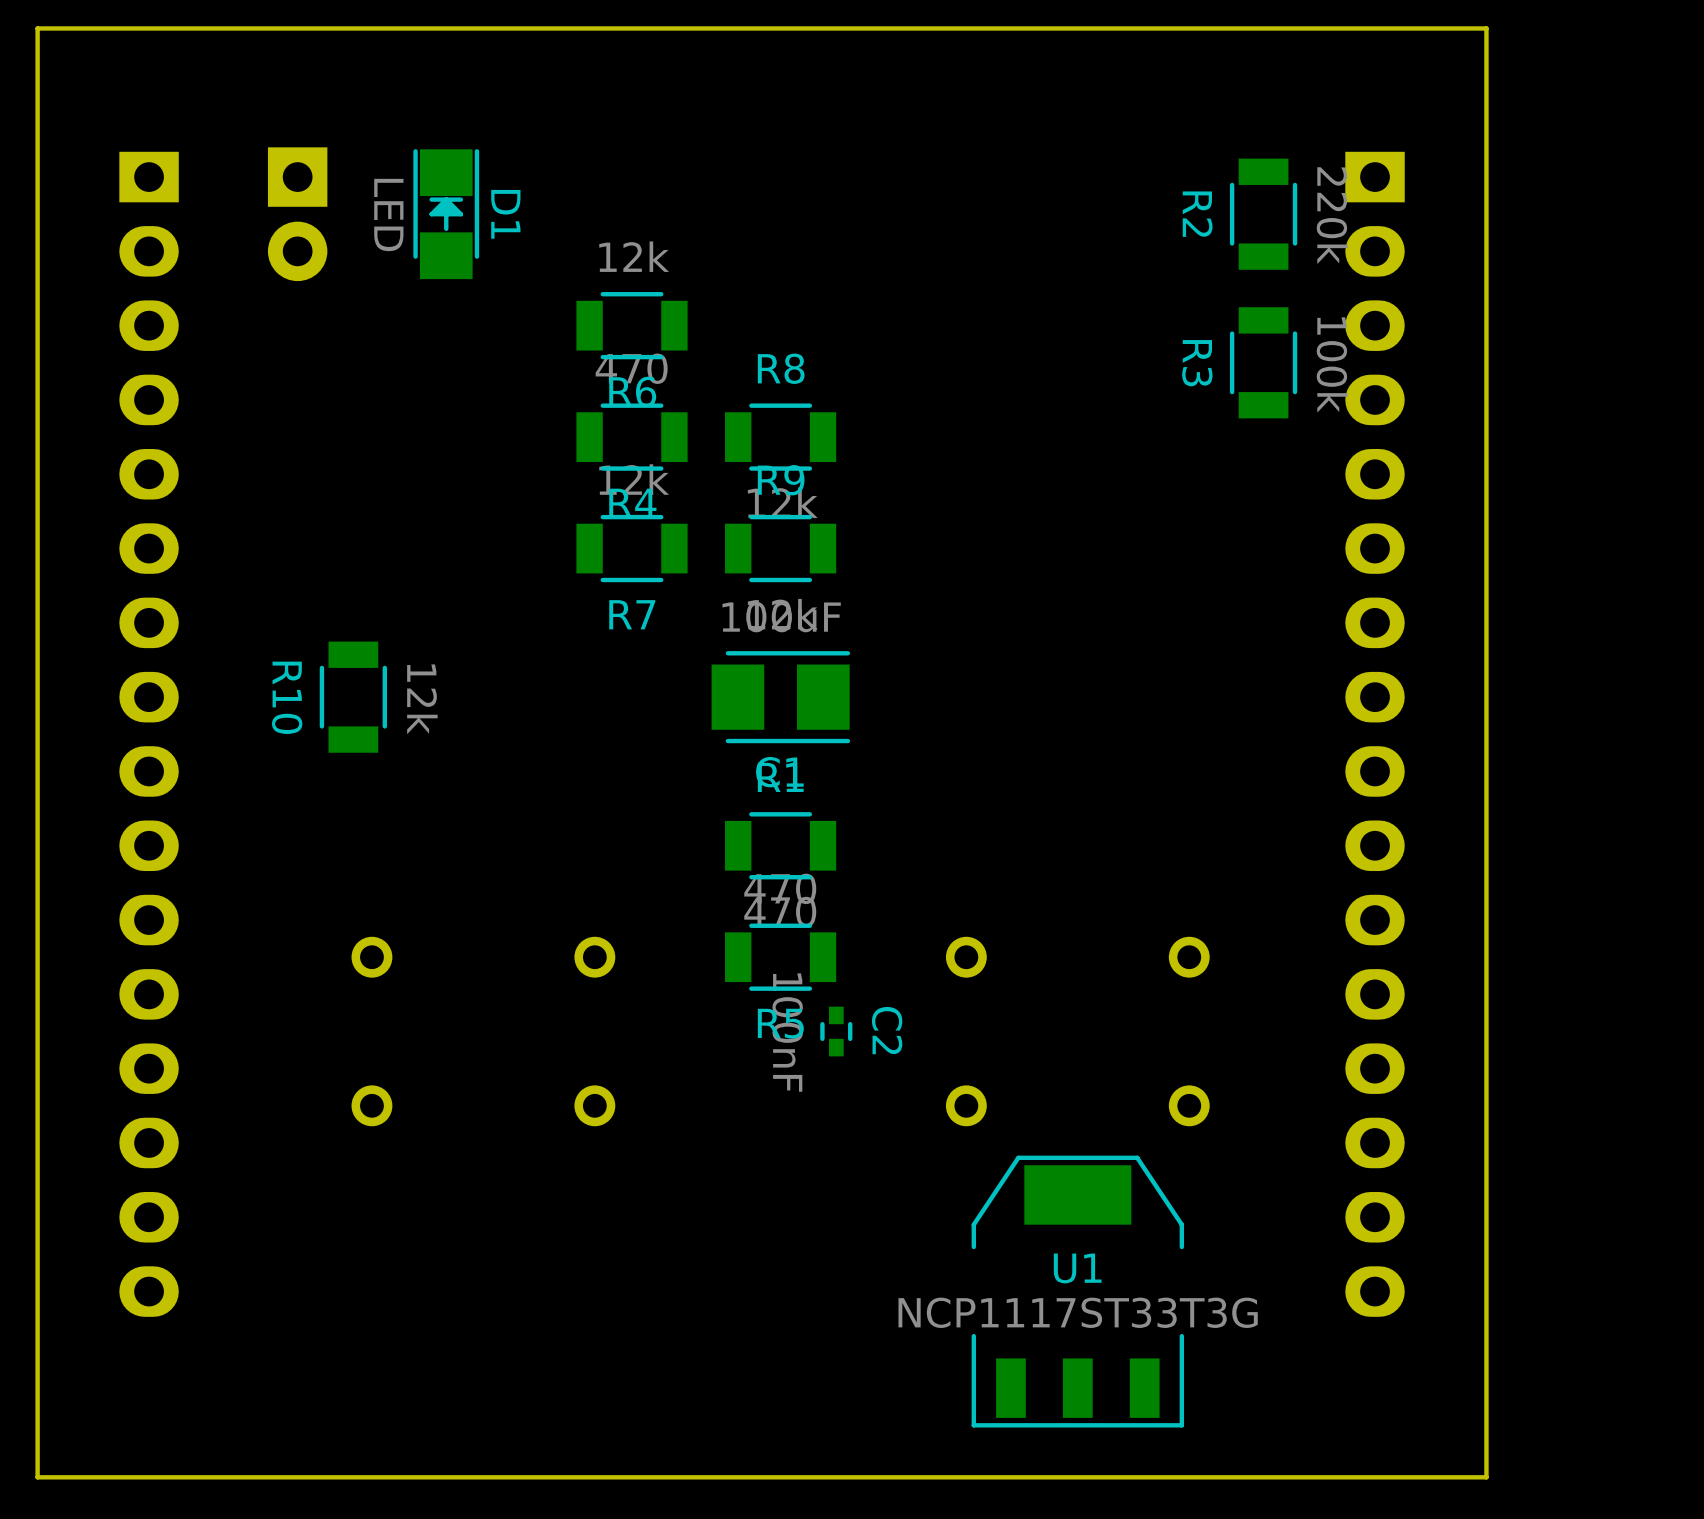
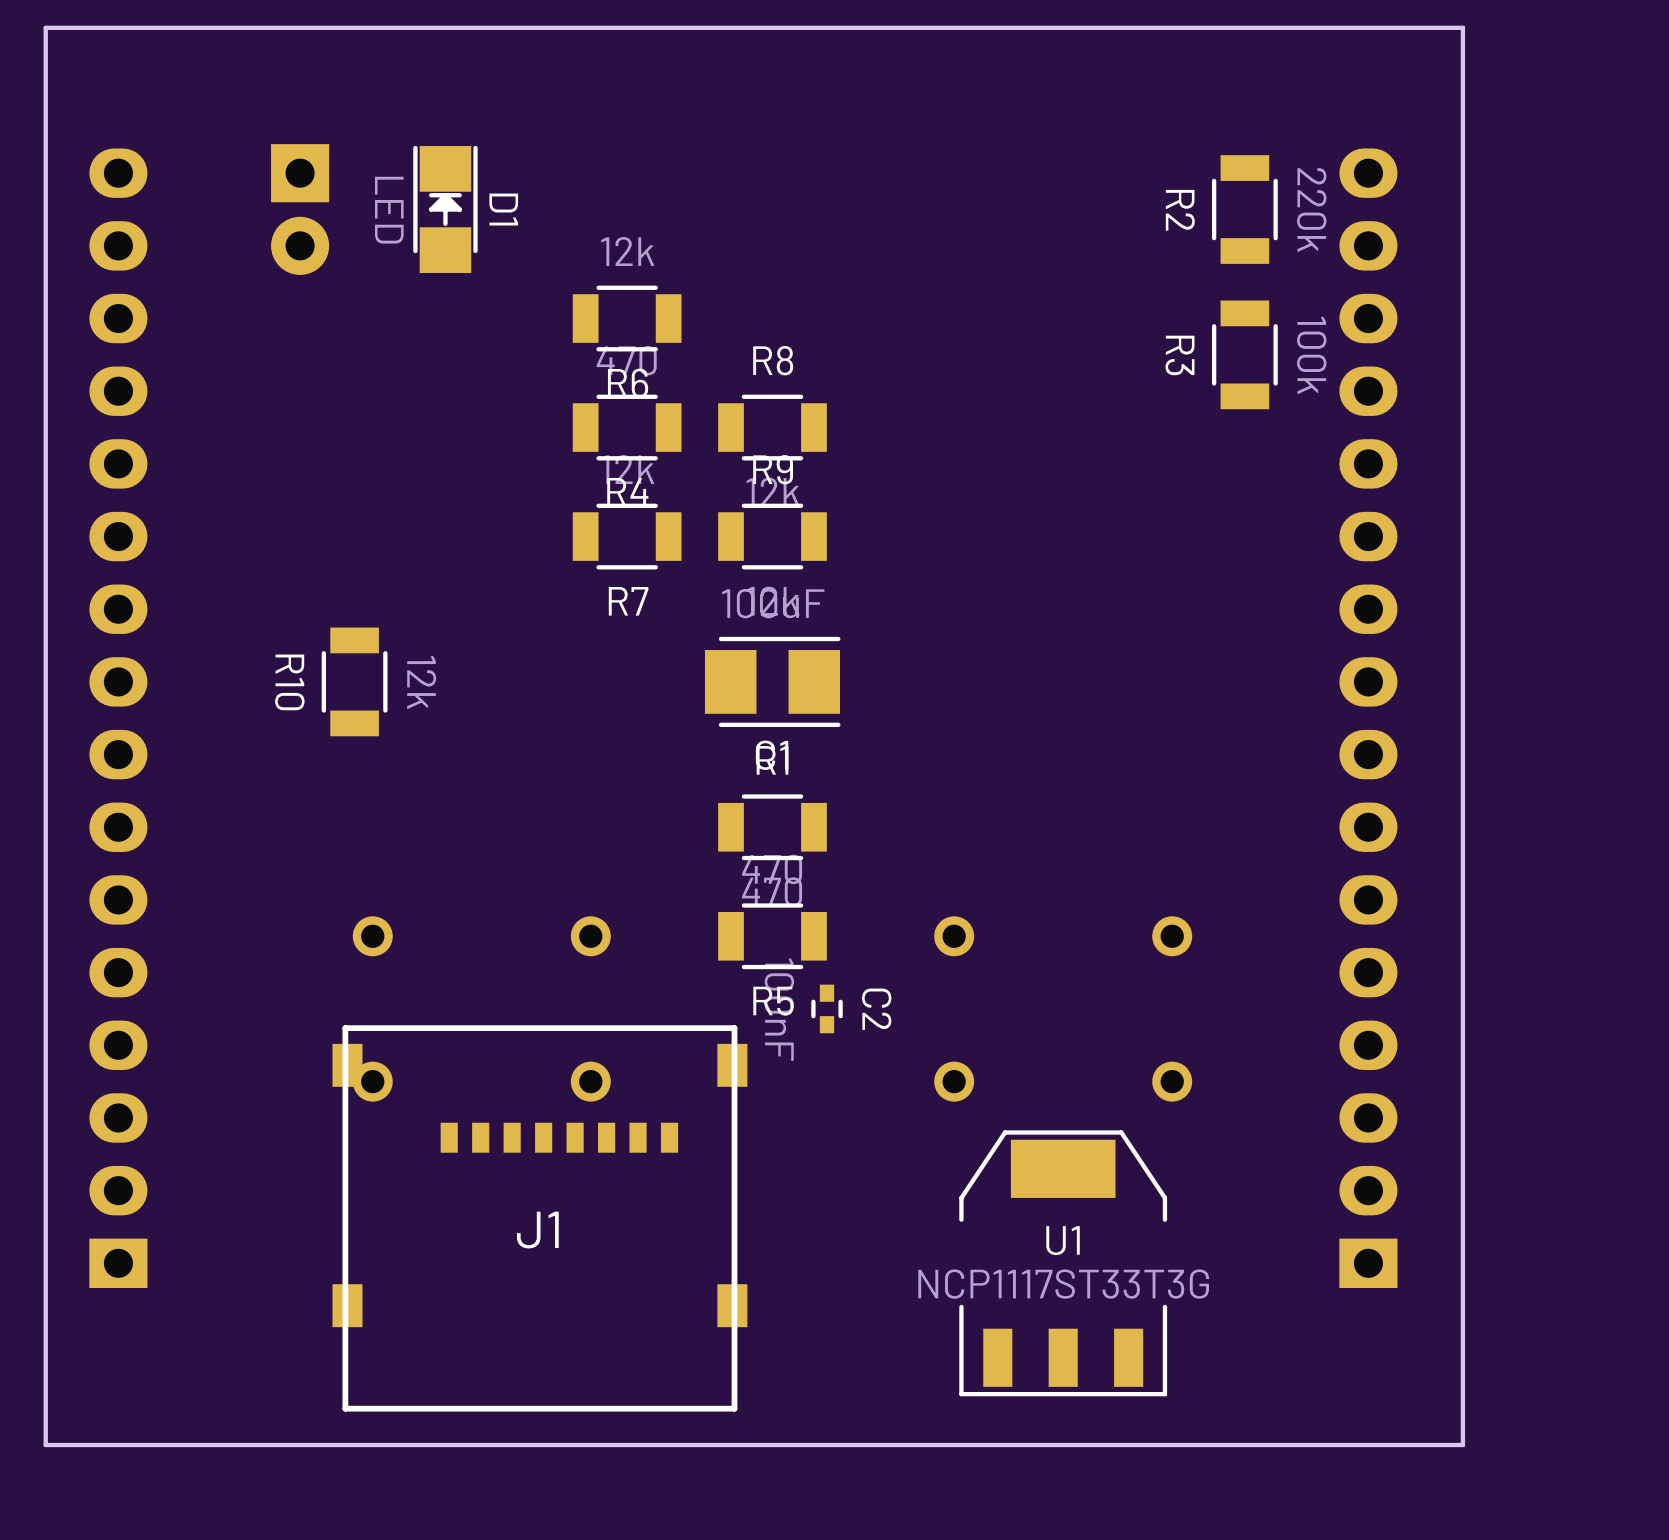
part rotation: 0° (149, 734) -> 180° (118, 718)
part rotation: 0° (1375, 734) -> 180° (1368, 718)
J1: none -> (539, 1218)

